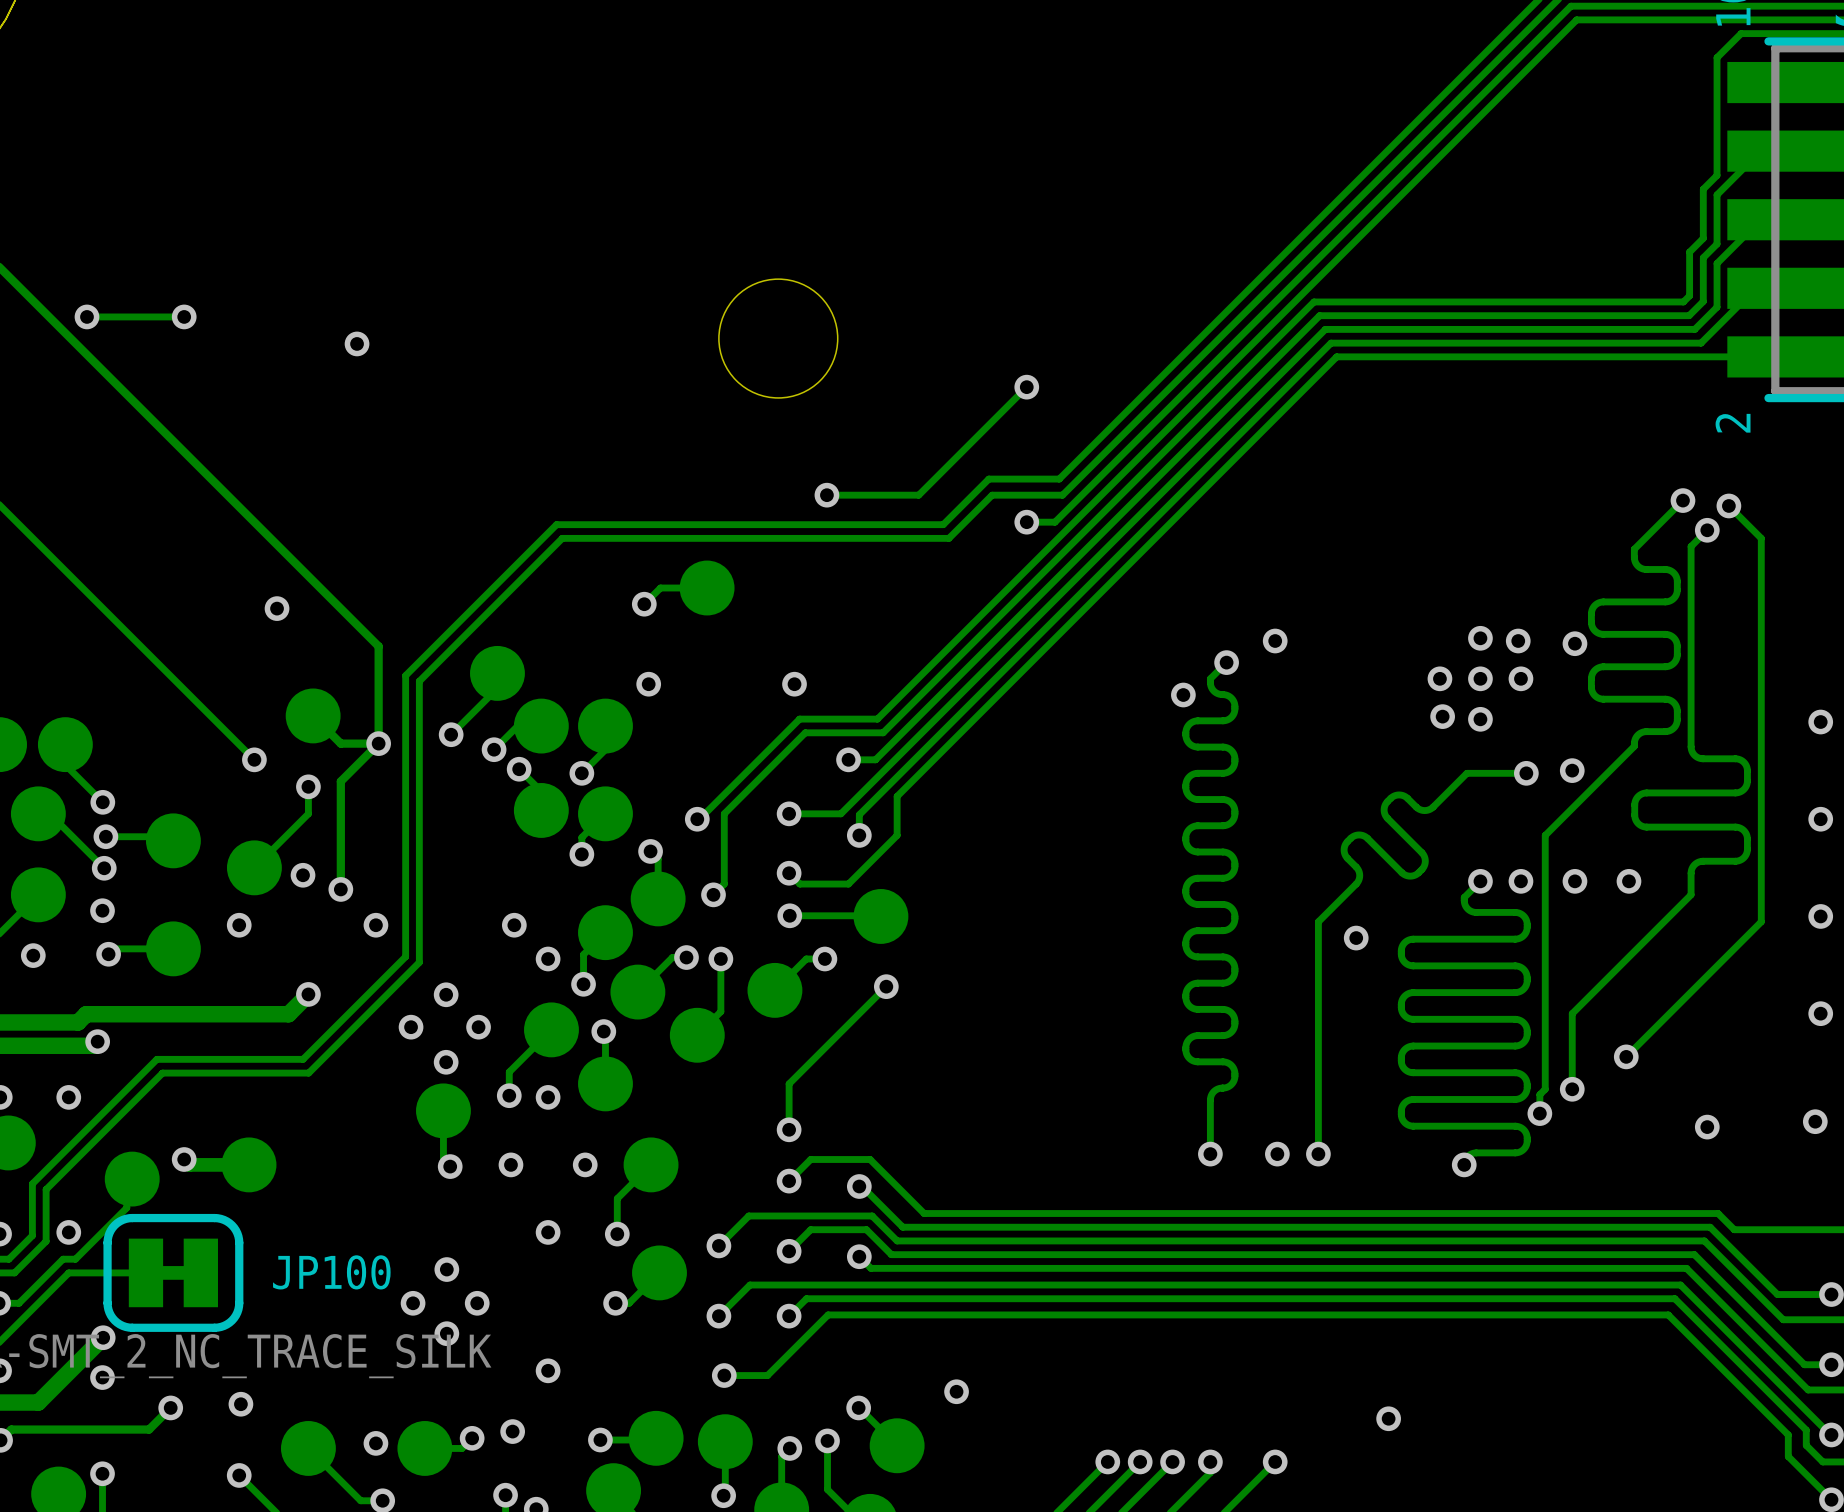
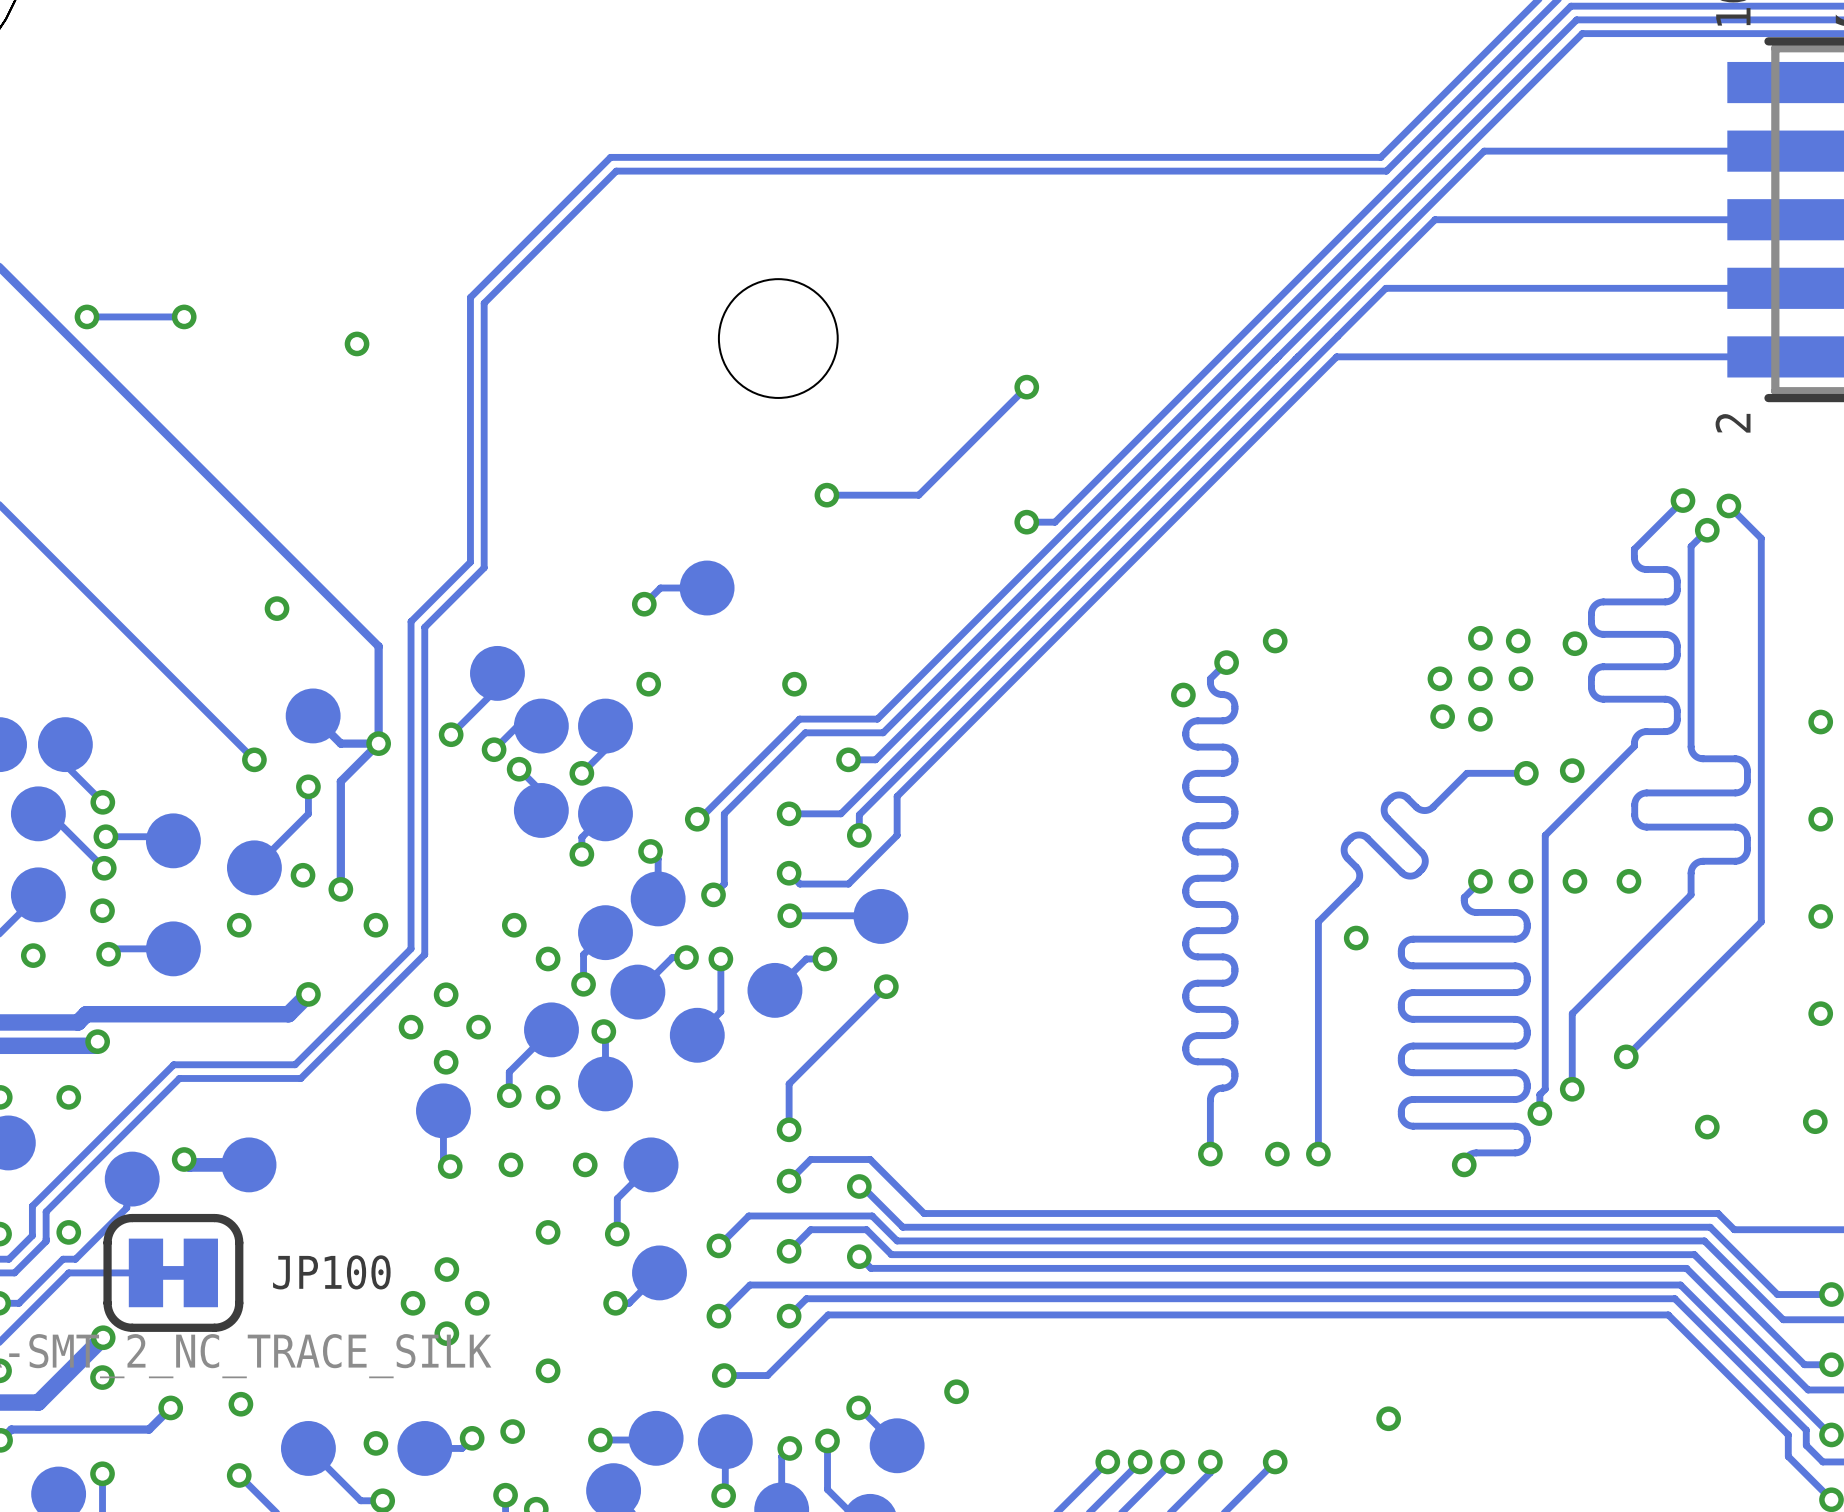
track: (1741, 33) (1717, 57) (1717, 175) (1703, 189) (1703, 238) (1689, 252) (1689, 295) (1683, 301) (1313, 301) -> (1741, 33) (1582, 33) (1313, 301)
track: (1760, 151) (1717, 194) (1717, 244) (1703, 257) (1703, 301) (1689, 315) (1319, 315) -> (1760, 151) (1484, 151) (1319, 315)
track: (1380, 157) (1059, 479) (988, 479) (943, 524) (556, 524) (405, 675) (405, 956) (303, 1059) (156, 1059) (32, 1183) (32, 1206) -> (1380, 157) (610, 157) (470, 297) (470, 562) (411, 621) (411, 948) (295, 1064) (173, 1064) (32, 1206)
track: (1386, 171) (1062, 495) (992, 495) (948, 538) (562, 538) (419, 681) (419, 962) (308, 1073) (162, 1073) (46, 1189) (46, 1211) -> (1386, 171) (616, 171) (484, 303) (484, 567) (424, 627) (424, 954) (300, 1078) (179, 1078) (46, 1211)
track: (1760, 219) (1717, 263) (1717, 307) (1694, 329) (1325, 329) -> (1760, 219) (1435, 219) (1325, 329)
track: (1755, 288) (1701, 343) (1331, 343) -> (1755, 288) (1385, 288) (1331, 343)

